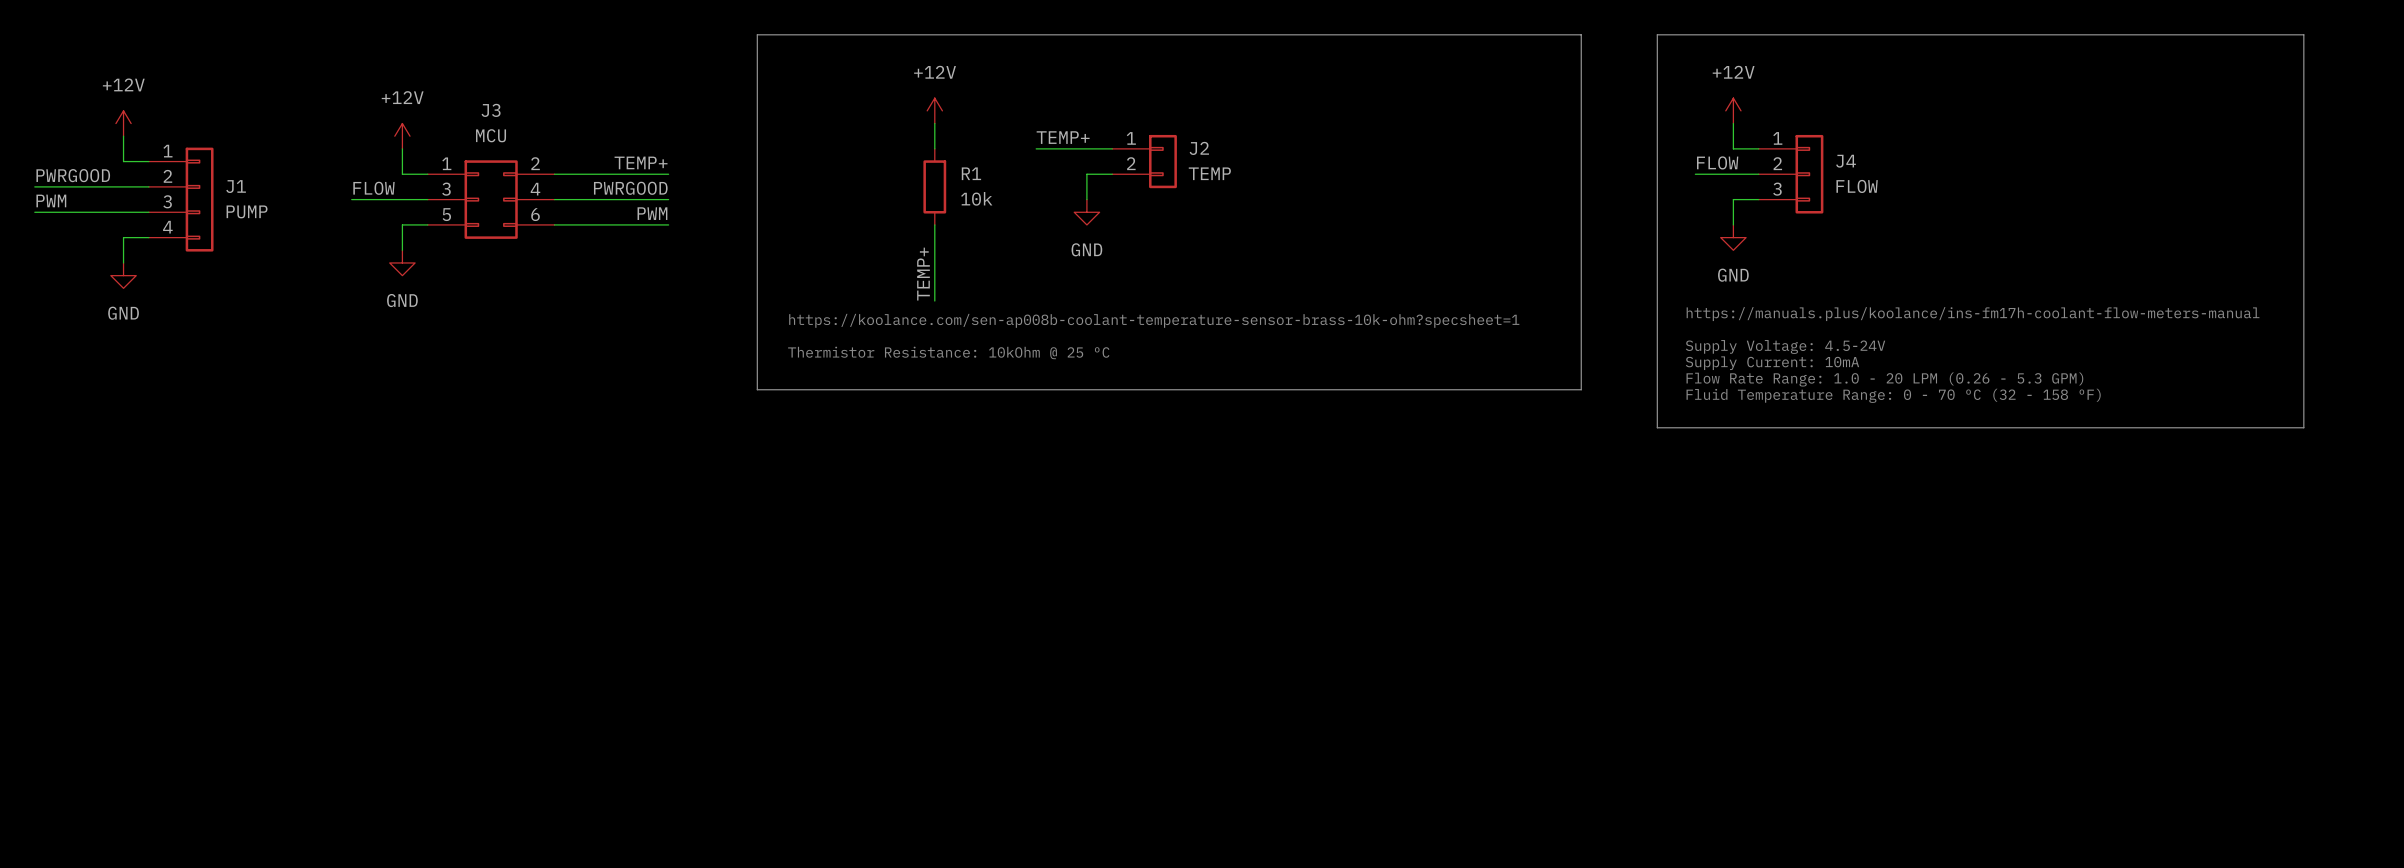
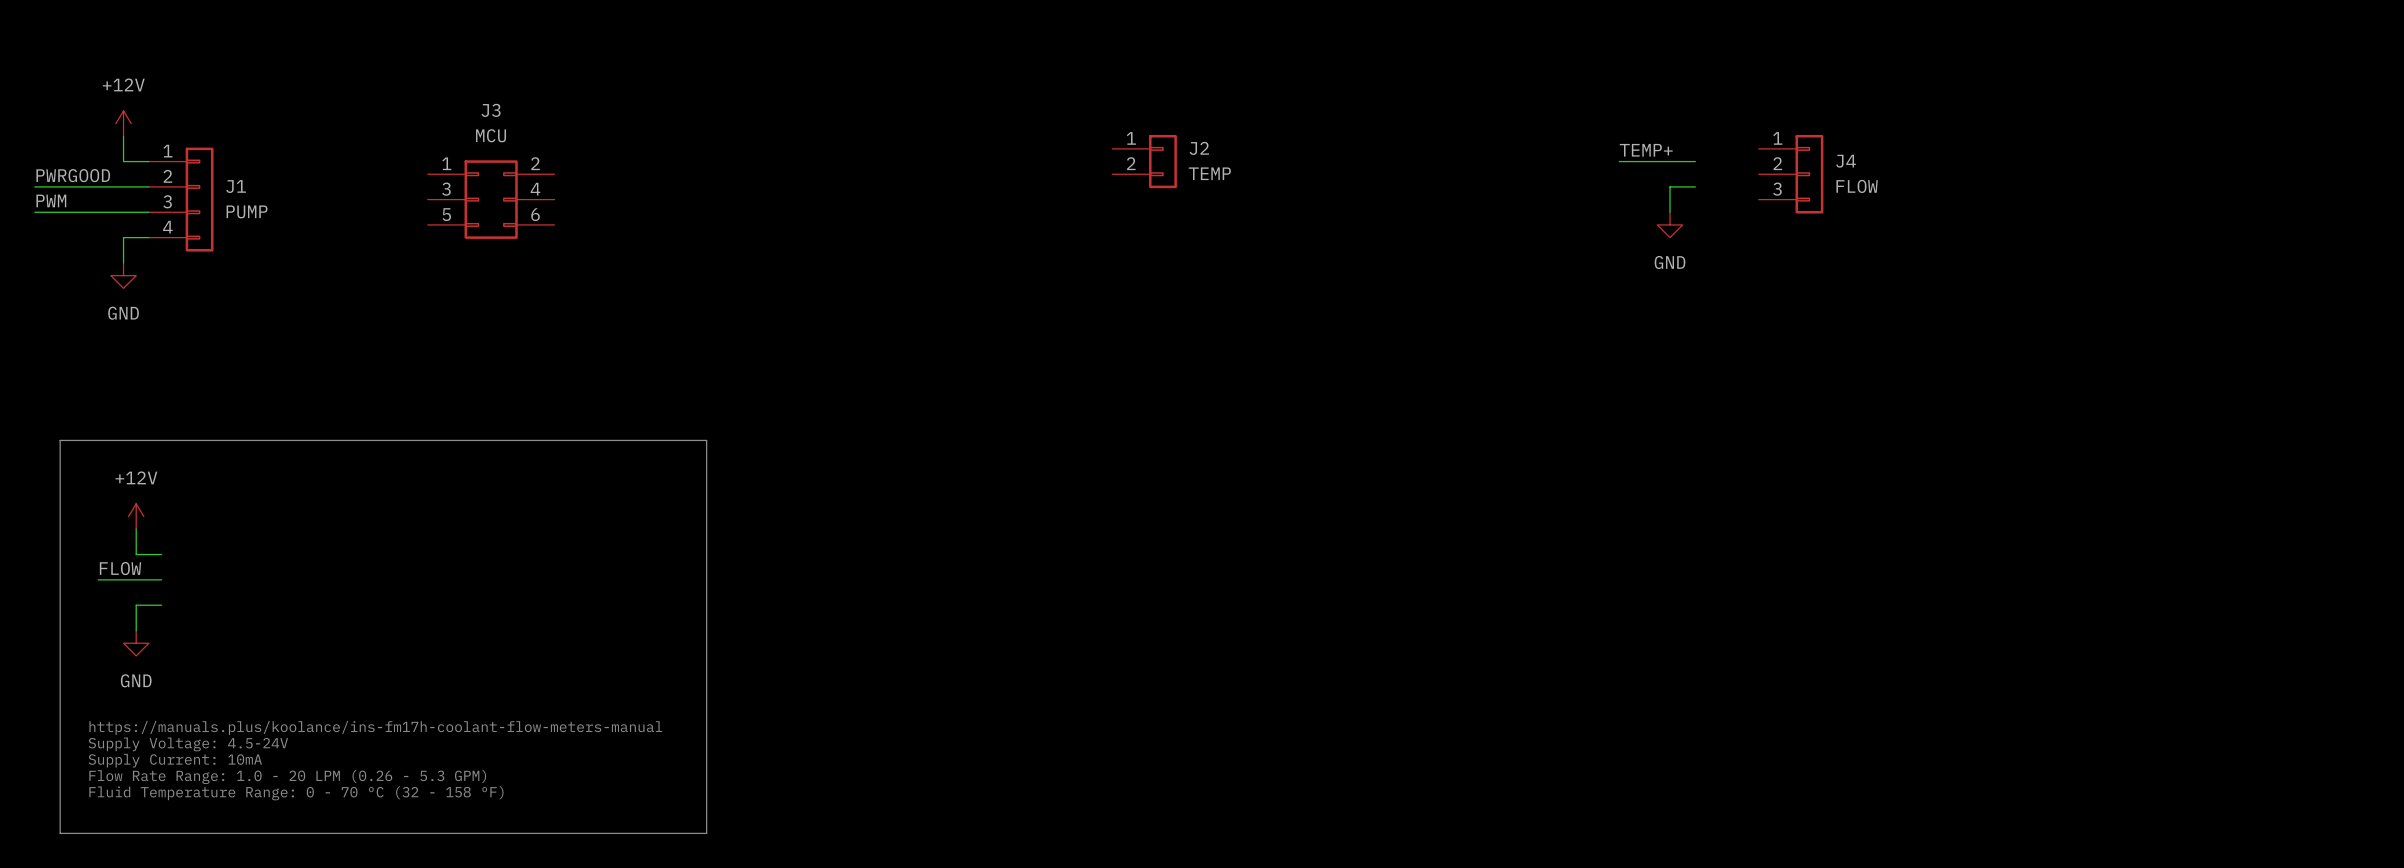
line: (757, 34) (1581, 34) (1581, 389) (757, 389) (757, 34) -> none
line: (1657, 34) (2303, 34) (2303, 427) (1657, 427) (1657, 34) -> none
power symbol: +12V (934, 110) -> none
power symbol: +12V (1733, 110) -> none
wire: (934, 123) (934, 148) -> none
wire: (1733, 123) (1733, 148) (1758, 148) -> none
power symbol: +12V (402, 136) -> none
label: TEMP+ (1063, 137) -> none
wire: (402, 148) (402, 174) (427, 174) -> none
wire: (1036, 148) (1112, 148) -> none
label: none -> TEMP+ (1646, 150)
wire: none -> (1619, 161) (1695, 161)
label: TEMP+ (641, 162) -> none
label: FLOW (1717, 162) -> none
wire: (554, 174) (668, 174) -> none
wire: (1112, 174) (1086, 174) (1086, 199) -> none
wire: (1695, 174) (1758, 174) -> none
R1: 10k (934, 186) -> none
label: FLOW (374, 188) -> none
label: PWRGOOD (630, 188) -> none
wire: (351, 199) (427, 199) -> none
wire: (554, 199) (668, 199) -> none
wire: (1758, 199) (1733, 199) (1733, 224) -> (1695, 186) (1670, 186) (1670, 212)
power symbol: GND (1086, 212) -> none
label: PWM (652, 213) -> none
wire: (427, 224) (402, 224) (402, 250) -> none
wire: (554, 224) (668, 224) -> none
wire: (934, 224) (934, 301) -> none
power symbol position: GND (1733, 237) -> GND (1670, 224)
power symbol: GND (402, 262) -> none
label: TEMP+ (923, 274) -> none
text: https://manuals.plus/koolance/ins-fm17h-coolant-flow-meters-manual (1973, 314) -> none
text: https://koolance.com/sen-ap008b-coolant-temperature-sensor-brass-10k-ohm?specsheet=1 (1154, 320) -> none
text: Supply Voltage: 4.5-24V (1785, 346) -> none
text: Thermistor Resistance: 10kOhm @ 25 ºC (948, 352) -> none
text: Supply Current: 10mA (1772, 363) -> none
text: Flow Rate Range: 1.0 - 20 LPM (0.26 - 5.3 GPM) (1884, 379) -> none
text: Fluid Temperature Range: 0 - 70 ºC (32 - 158 ºF) (1893, 395) -> none
line: none -> (60, 440) (706, 440) (706, 833) (60, 833) (60, 440)
power symbol: none -> +12V (136, 516)
wire: none -> (136, 529) (136, 554) (161, 554)
label: none -> FLOW (120, 568)
wire: none -> (98, 579) (161, 579)
wire: none -> (161, 605) (136, 605) (136, 630)
power symbol: none -> GND (136, 643)
text: none -> https://manuals.plus/koolance/ins-fm17h-coolant-flow-meters-manual (375, 727)
text: none -> Supply Voltage: 4.5-24V (188, 744)
text: none -> Supply Current: 10mA (175, 760)
text: none -> Flow Rate Range: 1.0 - 20 LPM (0.26 - 5.3 GPM) (287, 776)
text: none -> Fluid Temperature Range: 0 - 70 ºC (32 - 158 ºF) (296, 793)

